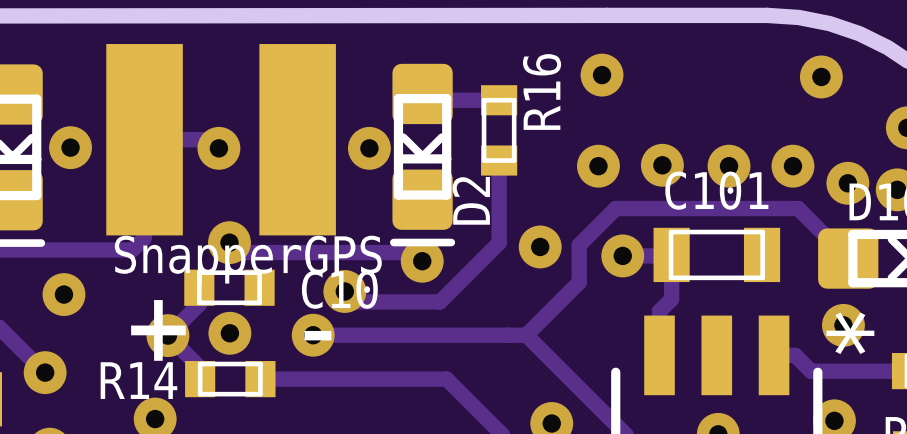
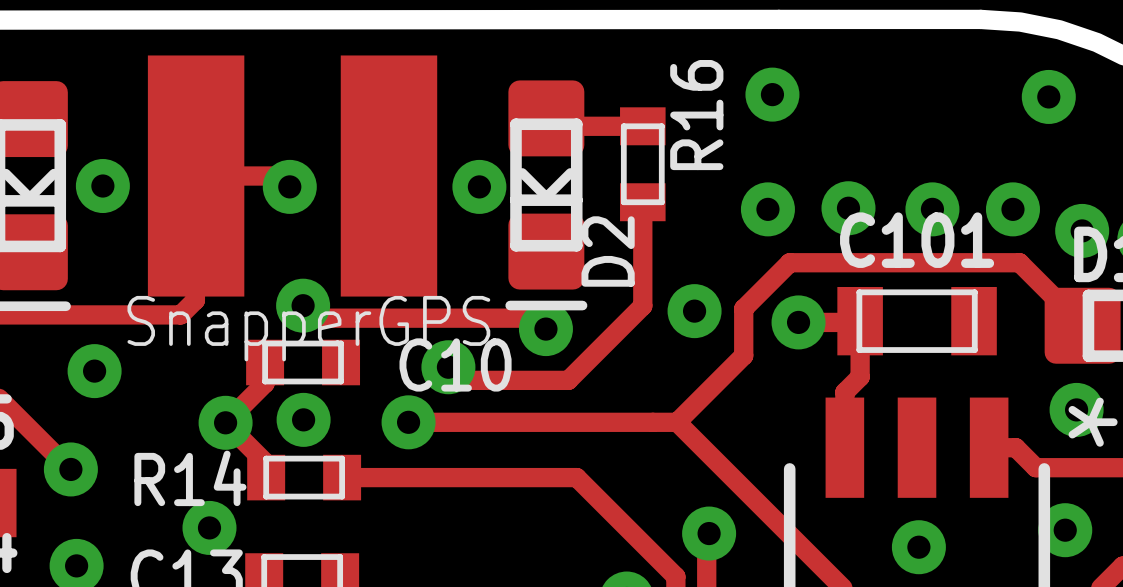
text: + (158, 330) -> none
text: - (317, 335) -> none

